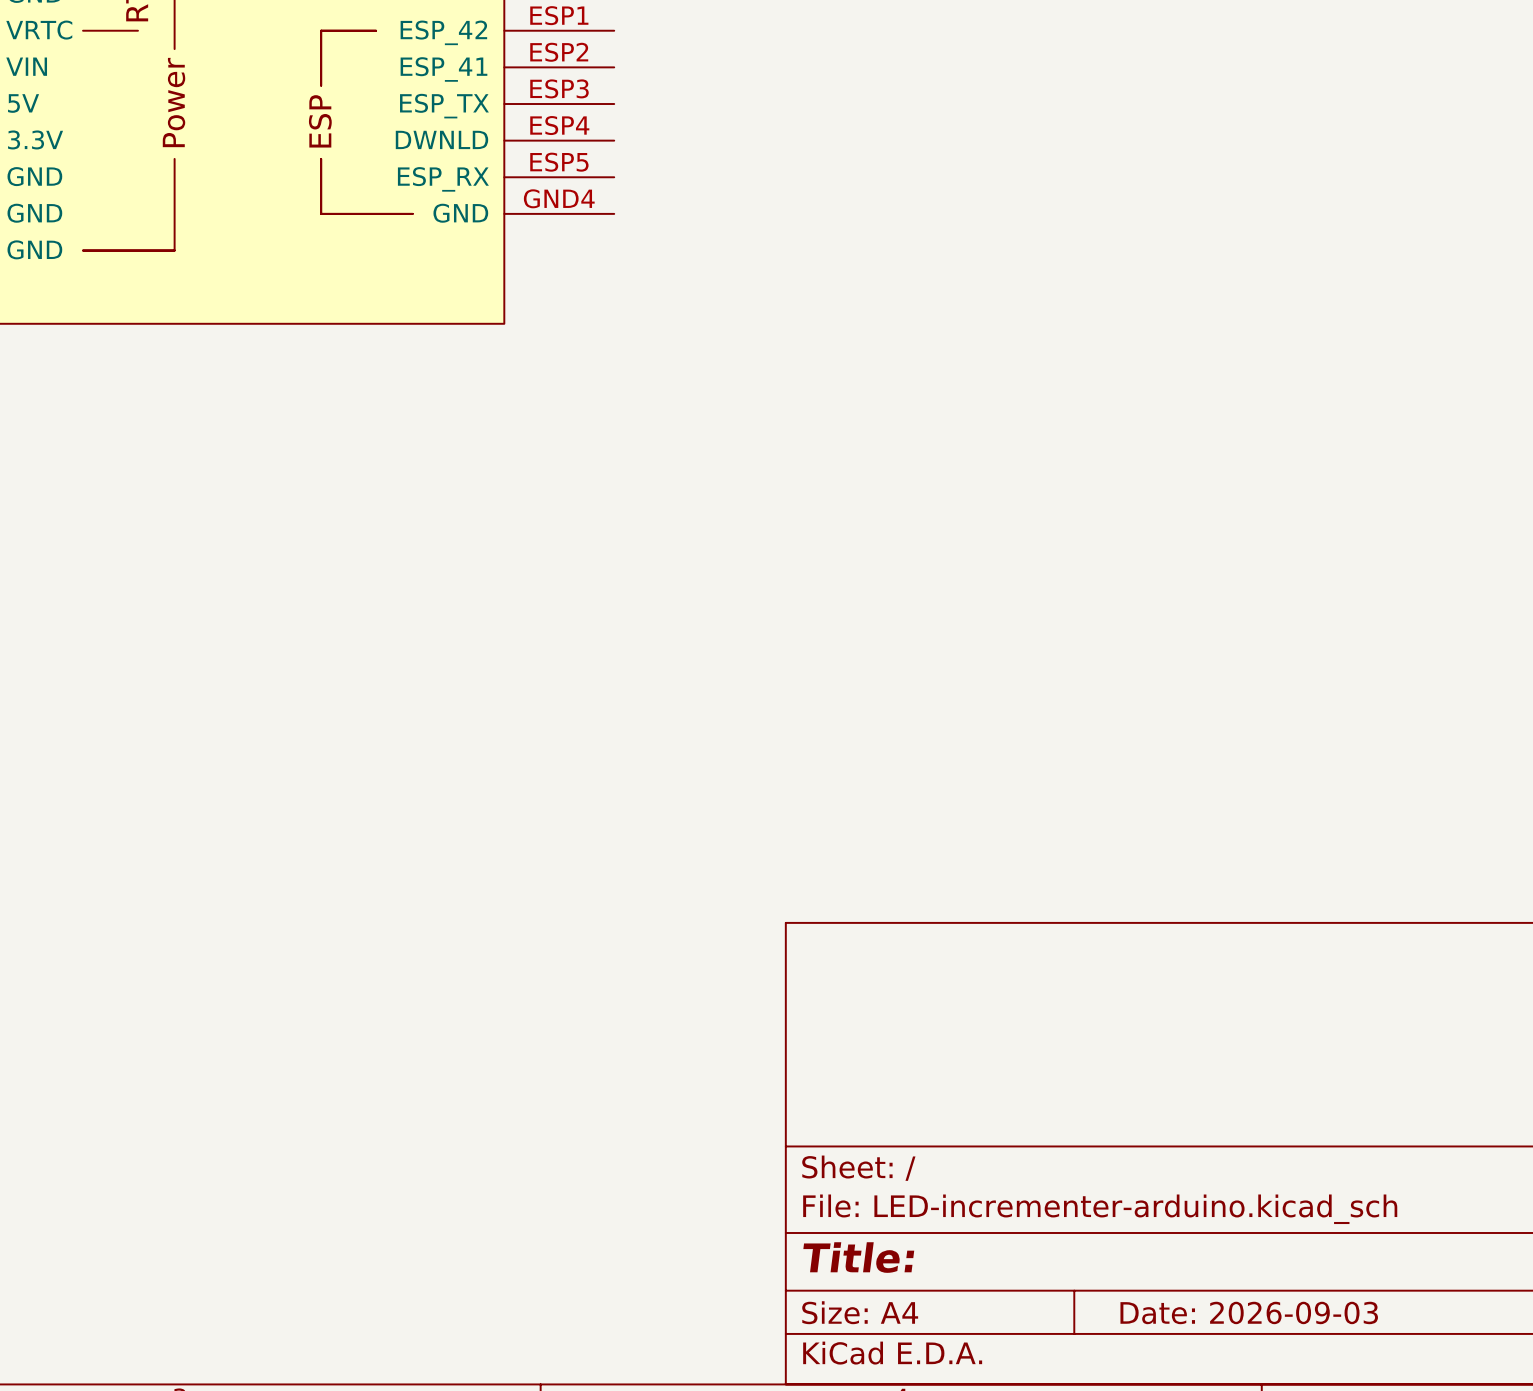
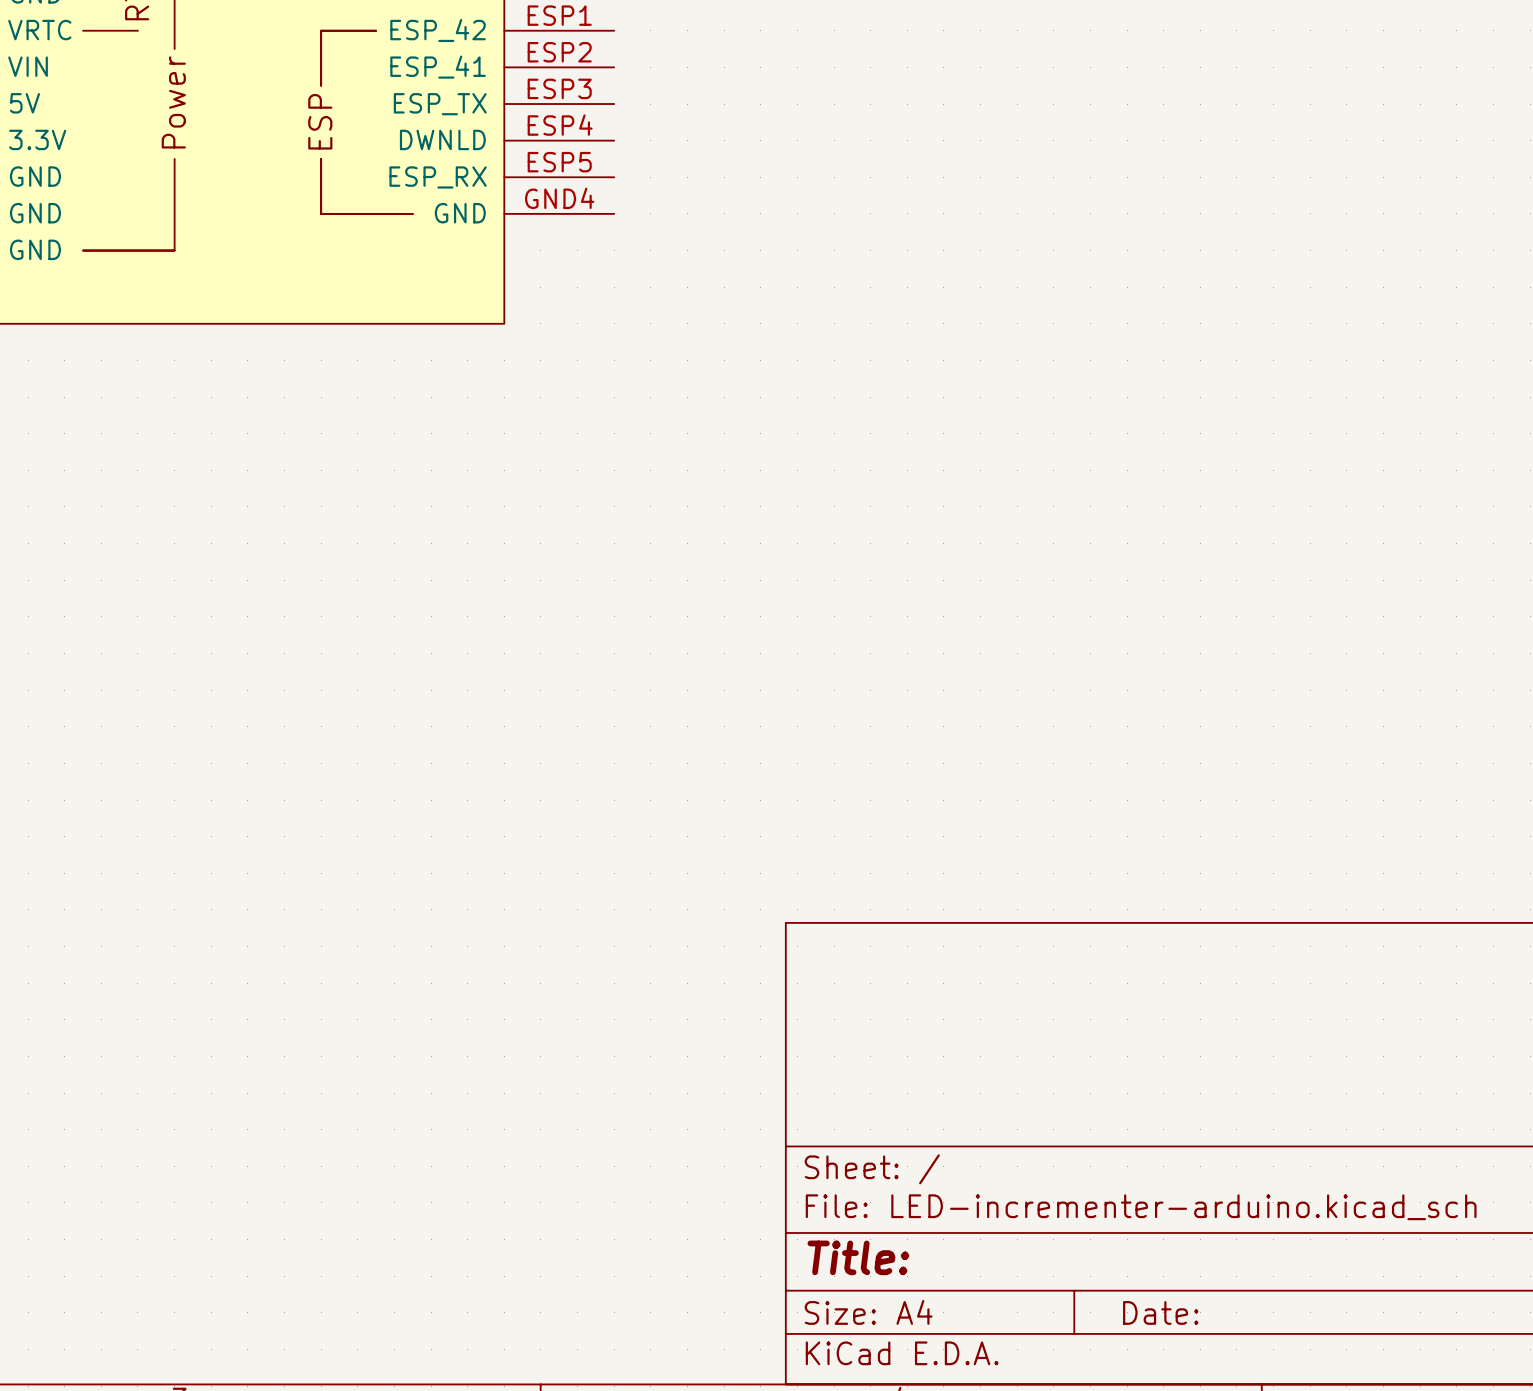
title block: Date: 2026-09-03 (1249, 1312) -> Date: (1160, 1312)

